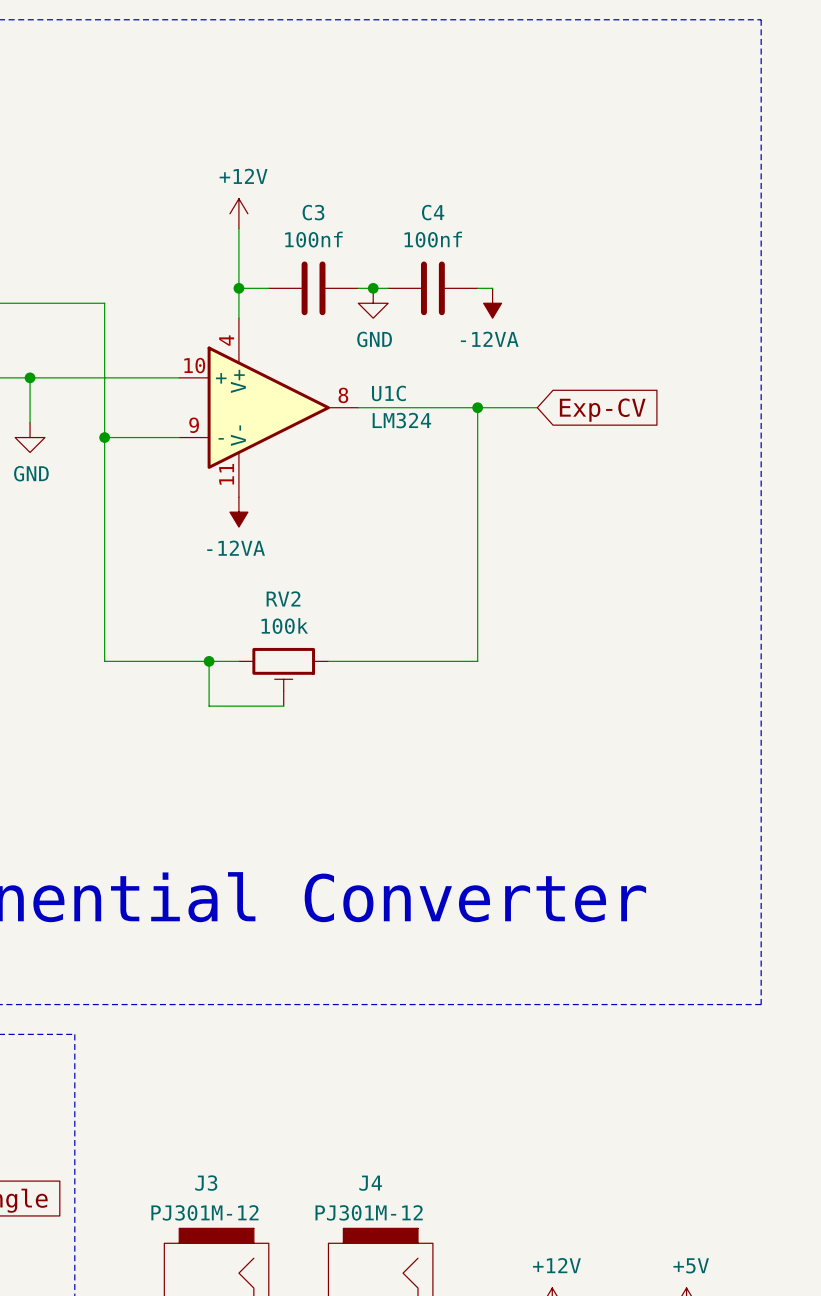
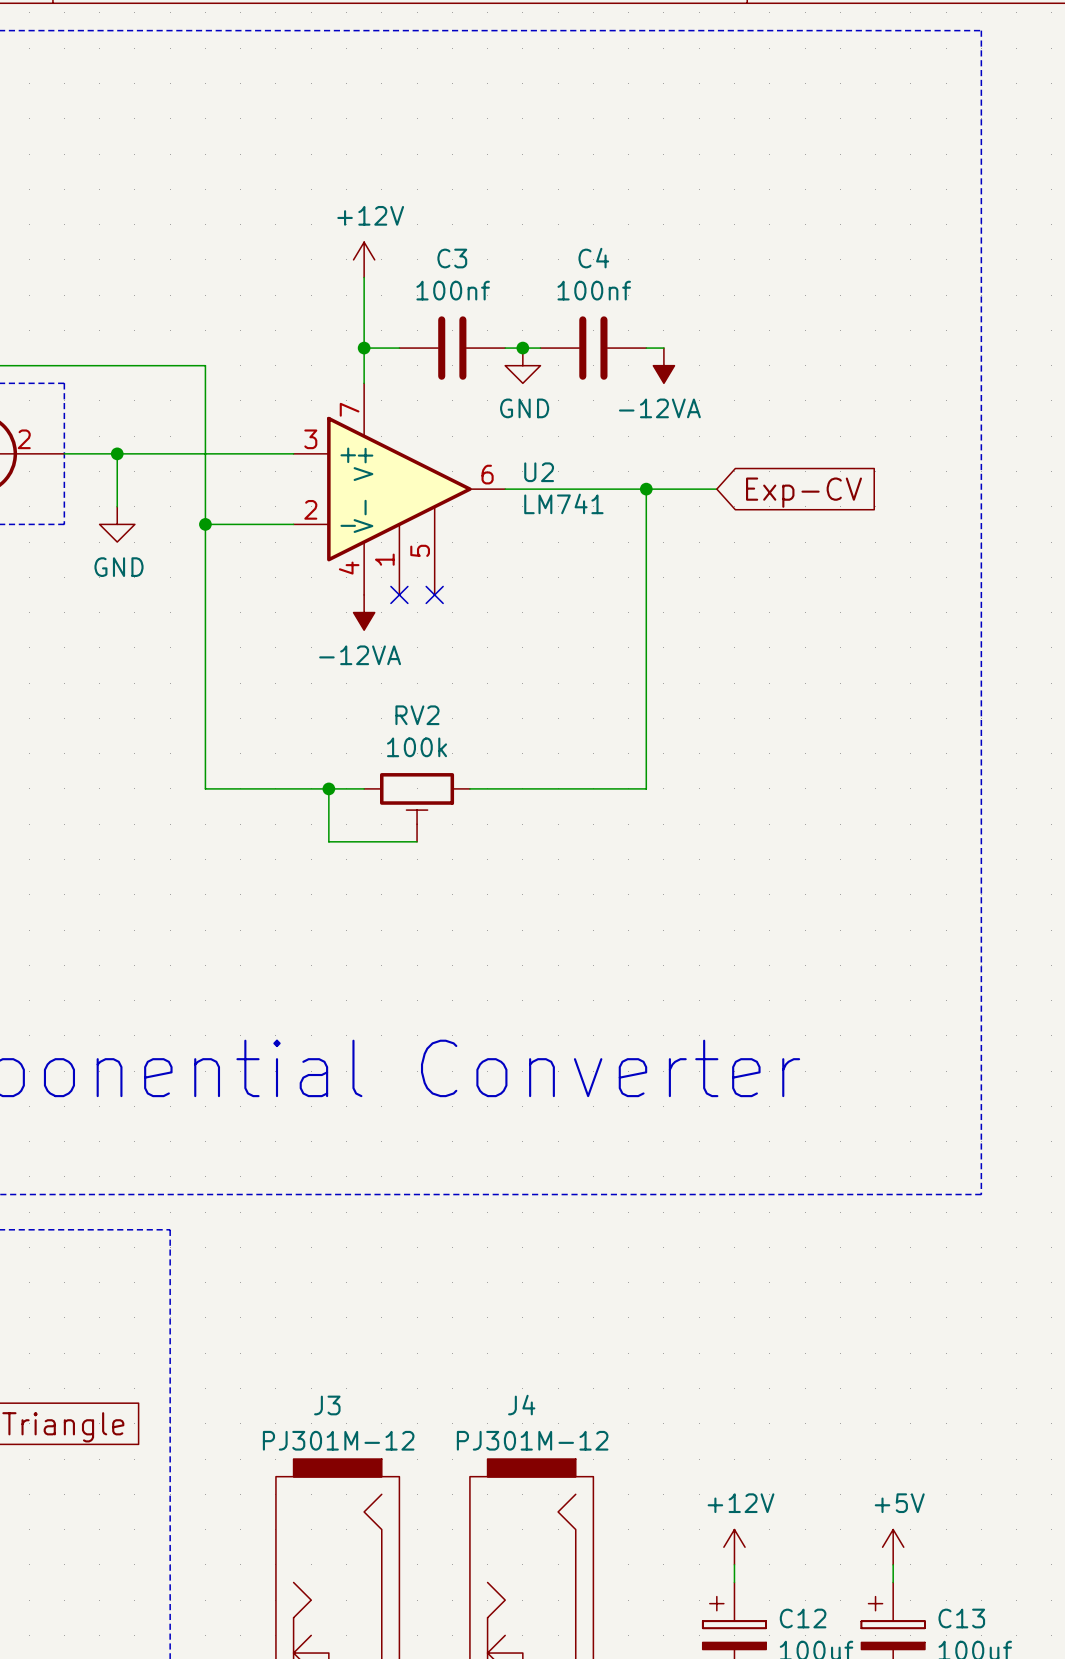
U1C: LM324 (268, 407) -> none
U2: none -> LM741 (399, 489)
no-connect mark: none -> (399, 594)
no-connect mark: none -> (434, 594)

